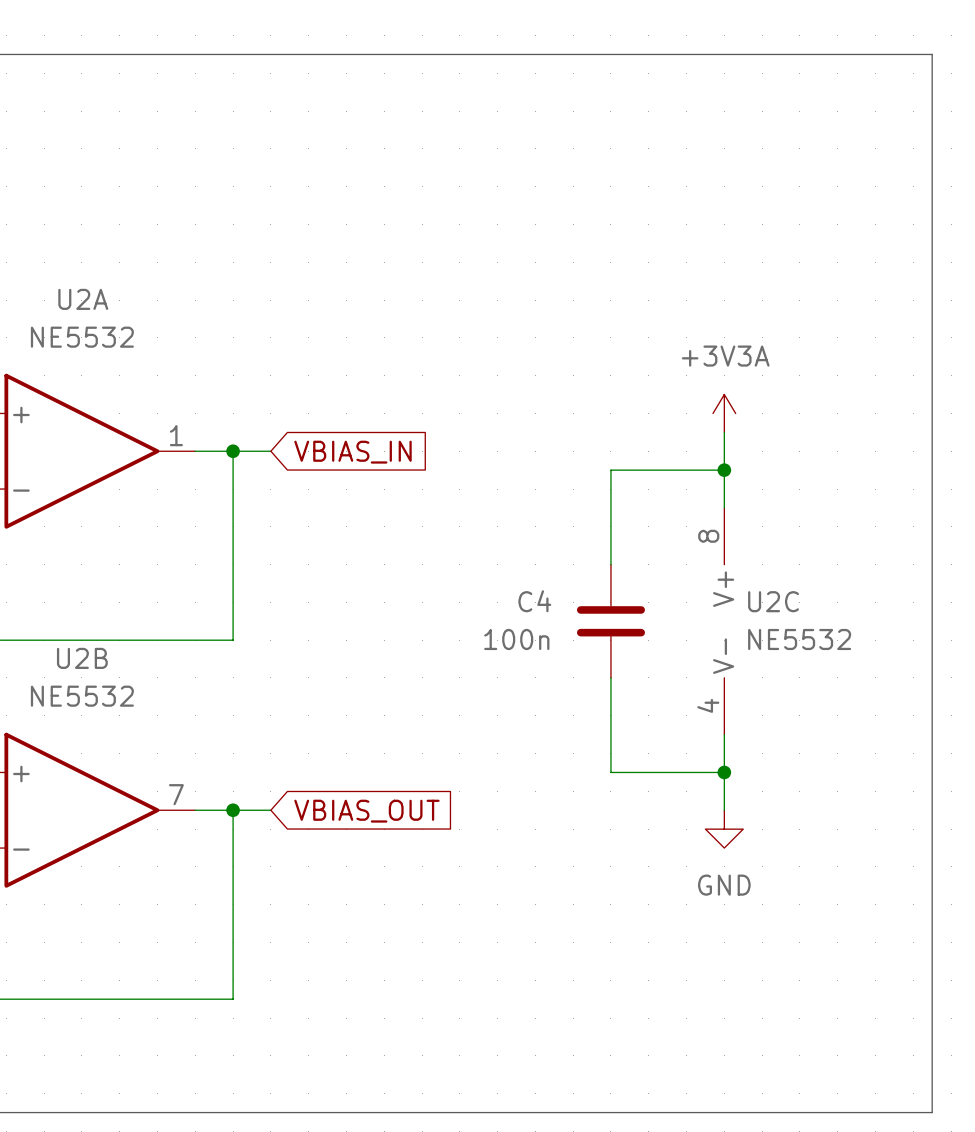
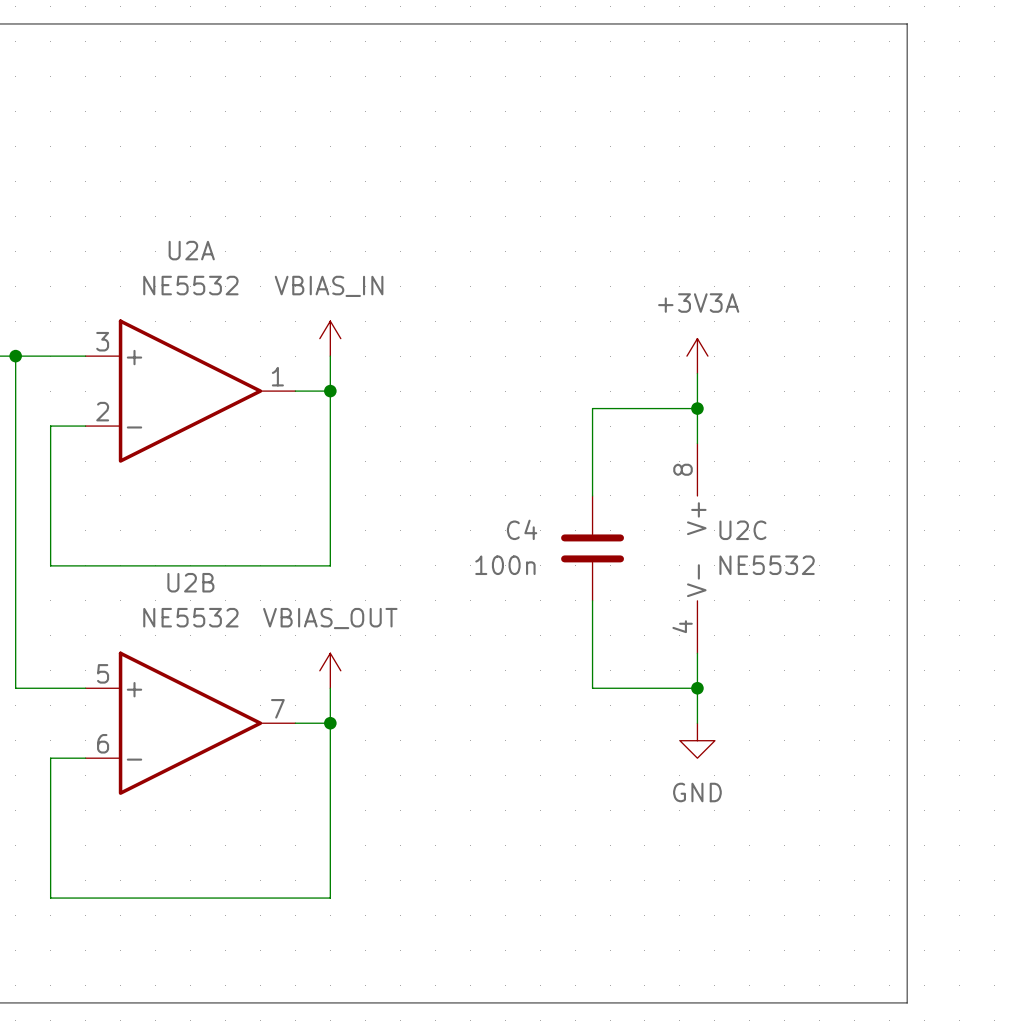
line: (856, 54) (932, 54) (932, 1112) (856, 1112) -> (907, 23) (907, 1002)
power symbol: none -> VBIAS_IN (330, 338)
power symbol position: +3V3A (724, 413) -> +3V3A (697, 356)
wire: (724, 432) (724, 507) -> (697, 373) (697, 443)
wire: (233, 451) (270, 451) -> (330, 391) (330, 356)
global label: VBIAS_IN (353, 452) -> none
wire: (610, 470) (610, 564) -> (679, 408) (592, 408) (592, 495)
wire: (629, 470) (724, 470) -> none
junction: none -> (697, 408)
junction: (724, 470) -> none
C4 position: (610, 621) -> (592, 548)
U2C position: (724, 621) -> (697, 548)
wire: (610, 677) (610, 772) -> (592, 600) (592, 688) (679, 688)
wire: (724, 734) (724, 810) -> (697, 653) (697, 723)
power symbol: none -> VBIAS_OUT (330, 670)
wire: (629, 772) (724, 772) -> none
junction: none -> (697, 688)
junction: (724, 772) -> none
wire: (233, 810) (270, 810) -> (330, 723) (330, 688)
global label: VBIAS_OUT (366, 811) -> none
power symbol position: GND (724, 829) -> GND (697, 740)

